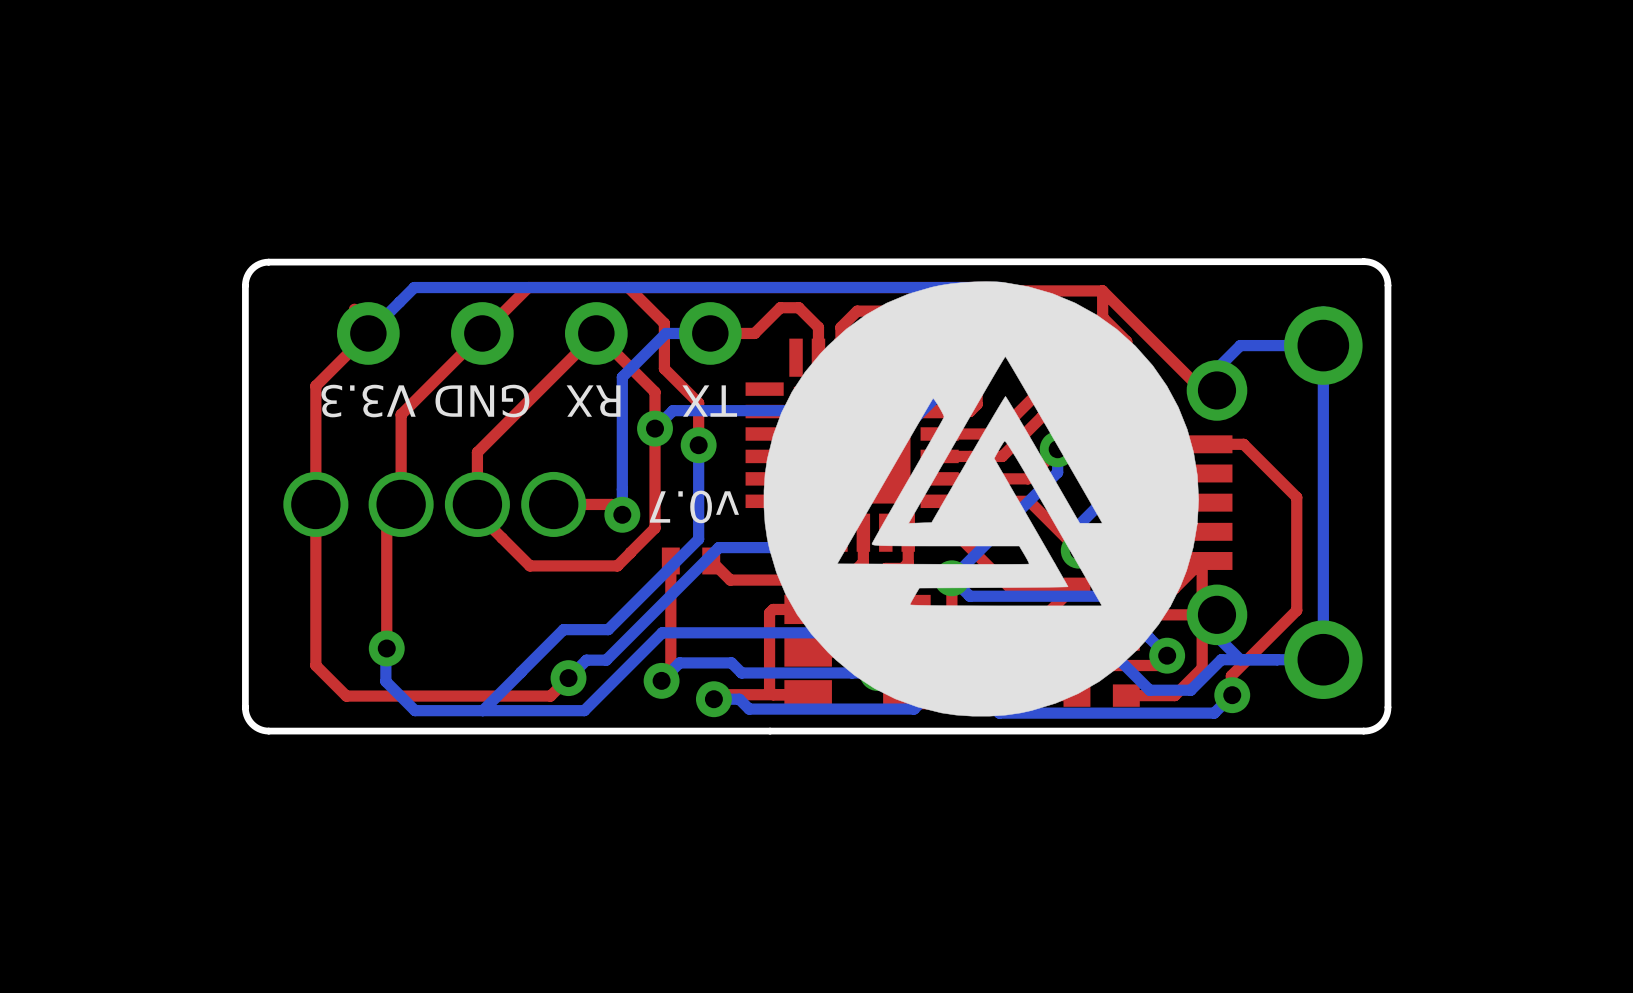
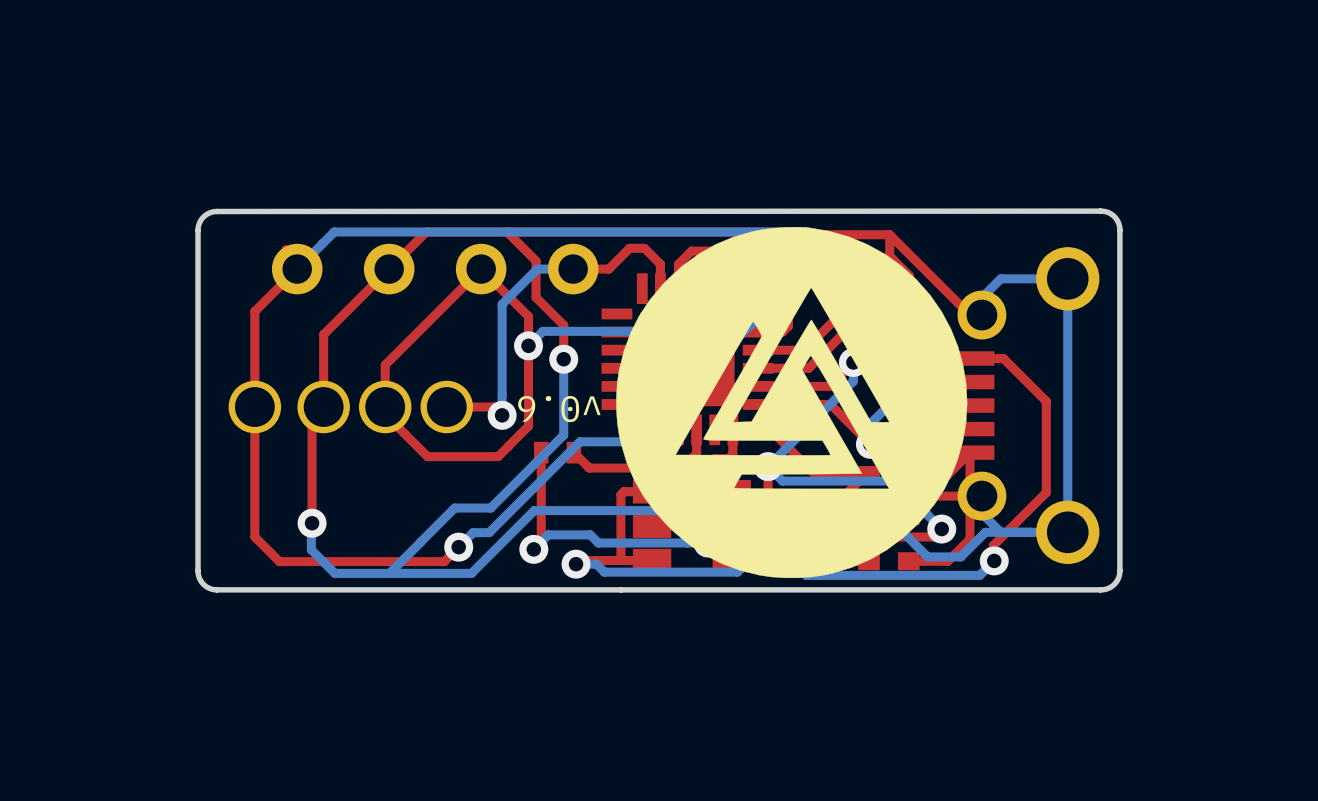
text: V3.3 (368, 401) -> none
text: GND (482, 401) -> none
text: RX (593, 401) -> none
text: TX (709, 401) -> none
text: v0.7 (694, 506) -> v0.6 (559, 409)

